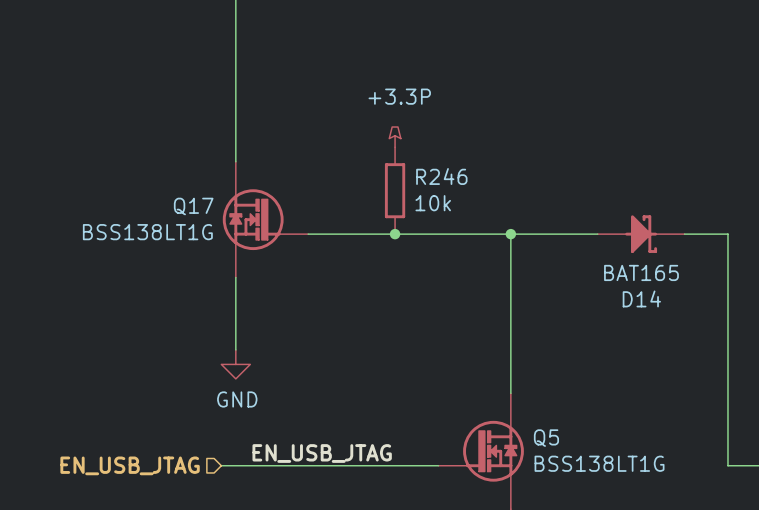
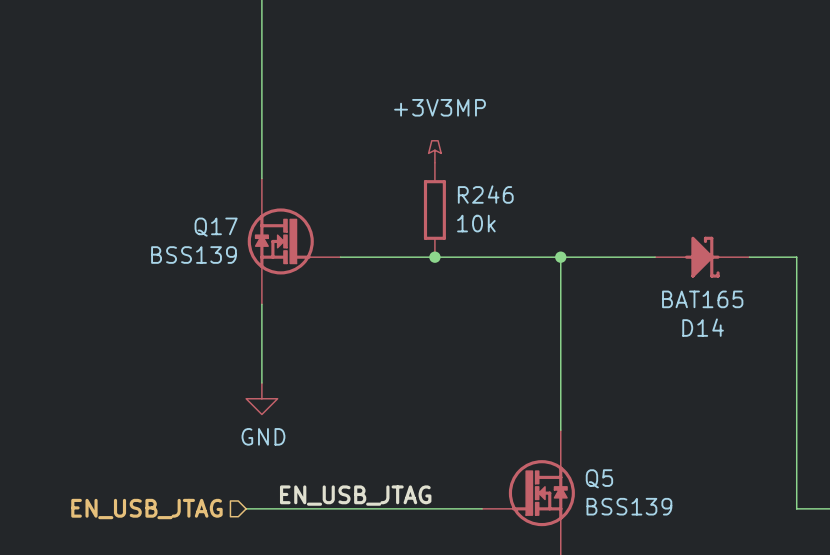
power symbol: +3.3P (395, 137) -> +3V3MP (434, 151)
Q17 value: BSS138LT1G (147, 232) -> BSS139 (194, 255)
Q5 value: BSS138LT1G (599, 463) -> BSS139 (629, 506)

